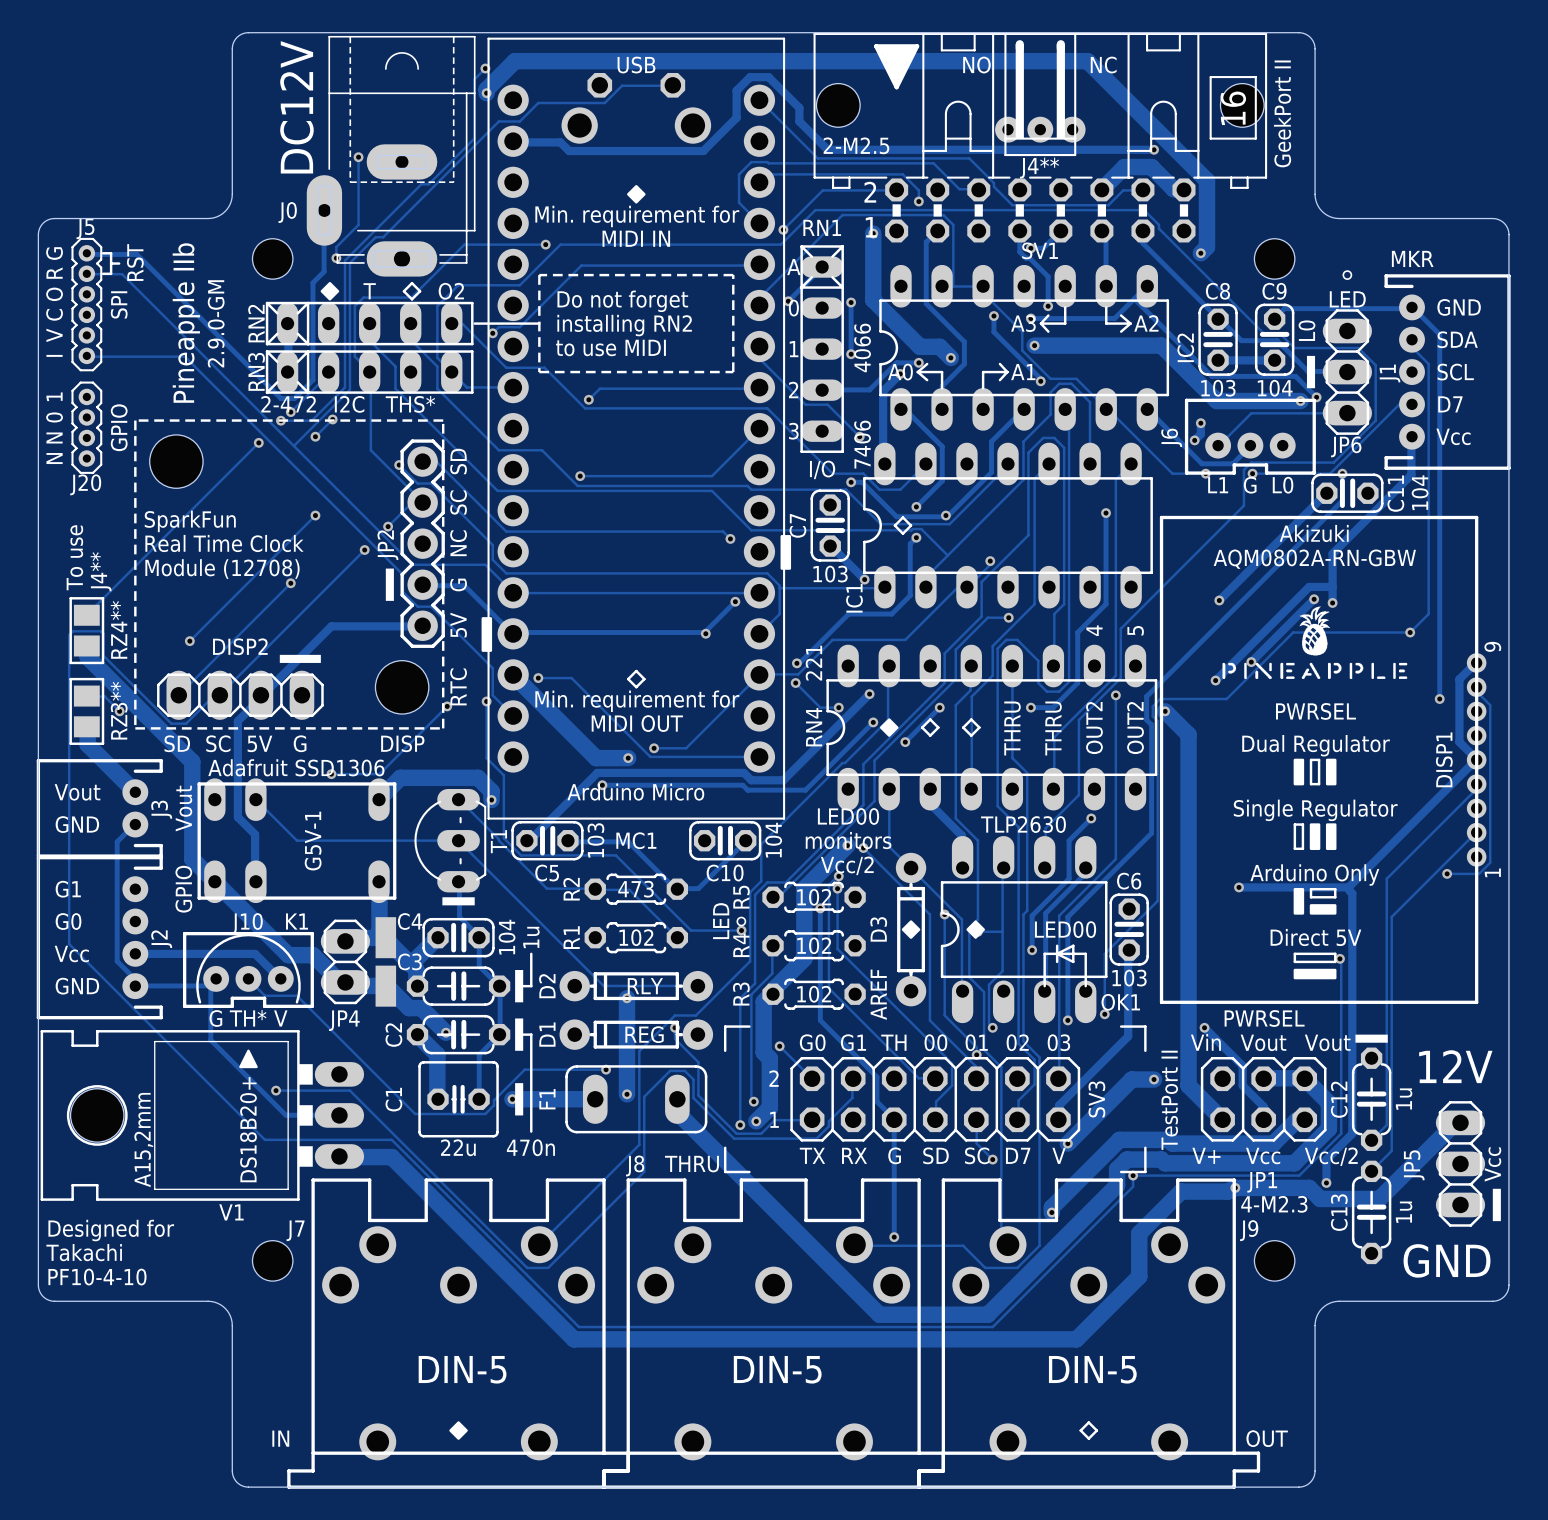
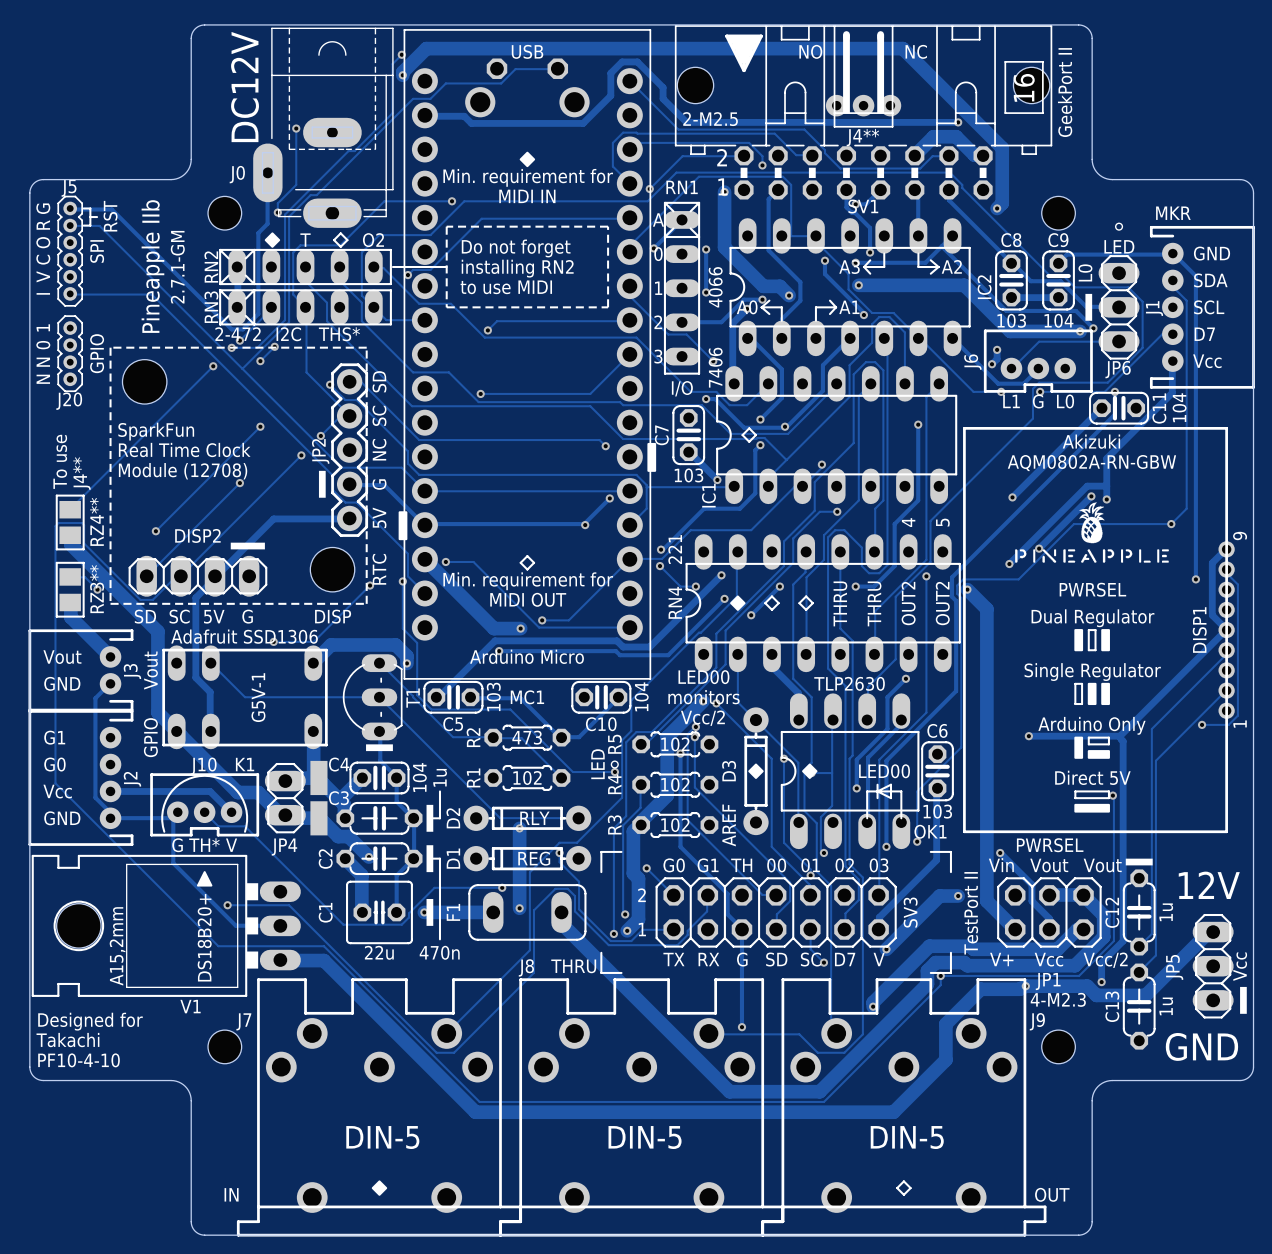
text: 2.9.0-GM (216, 323) -> 2.7.1-GM (177, 267)

